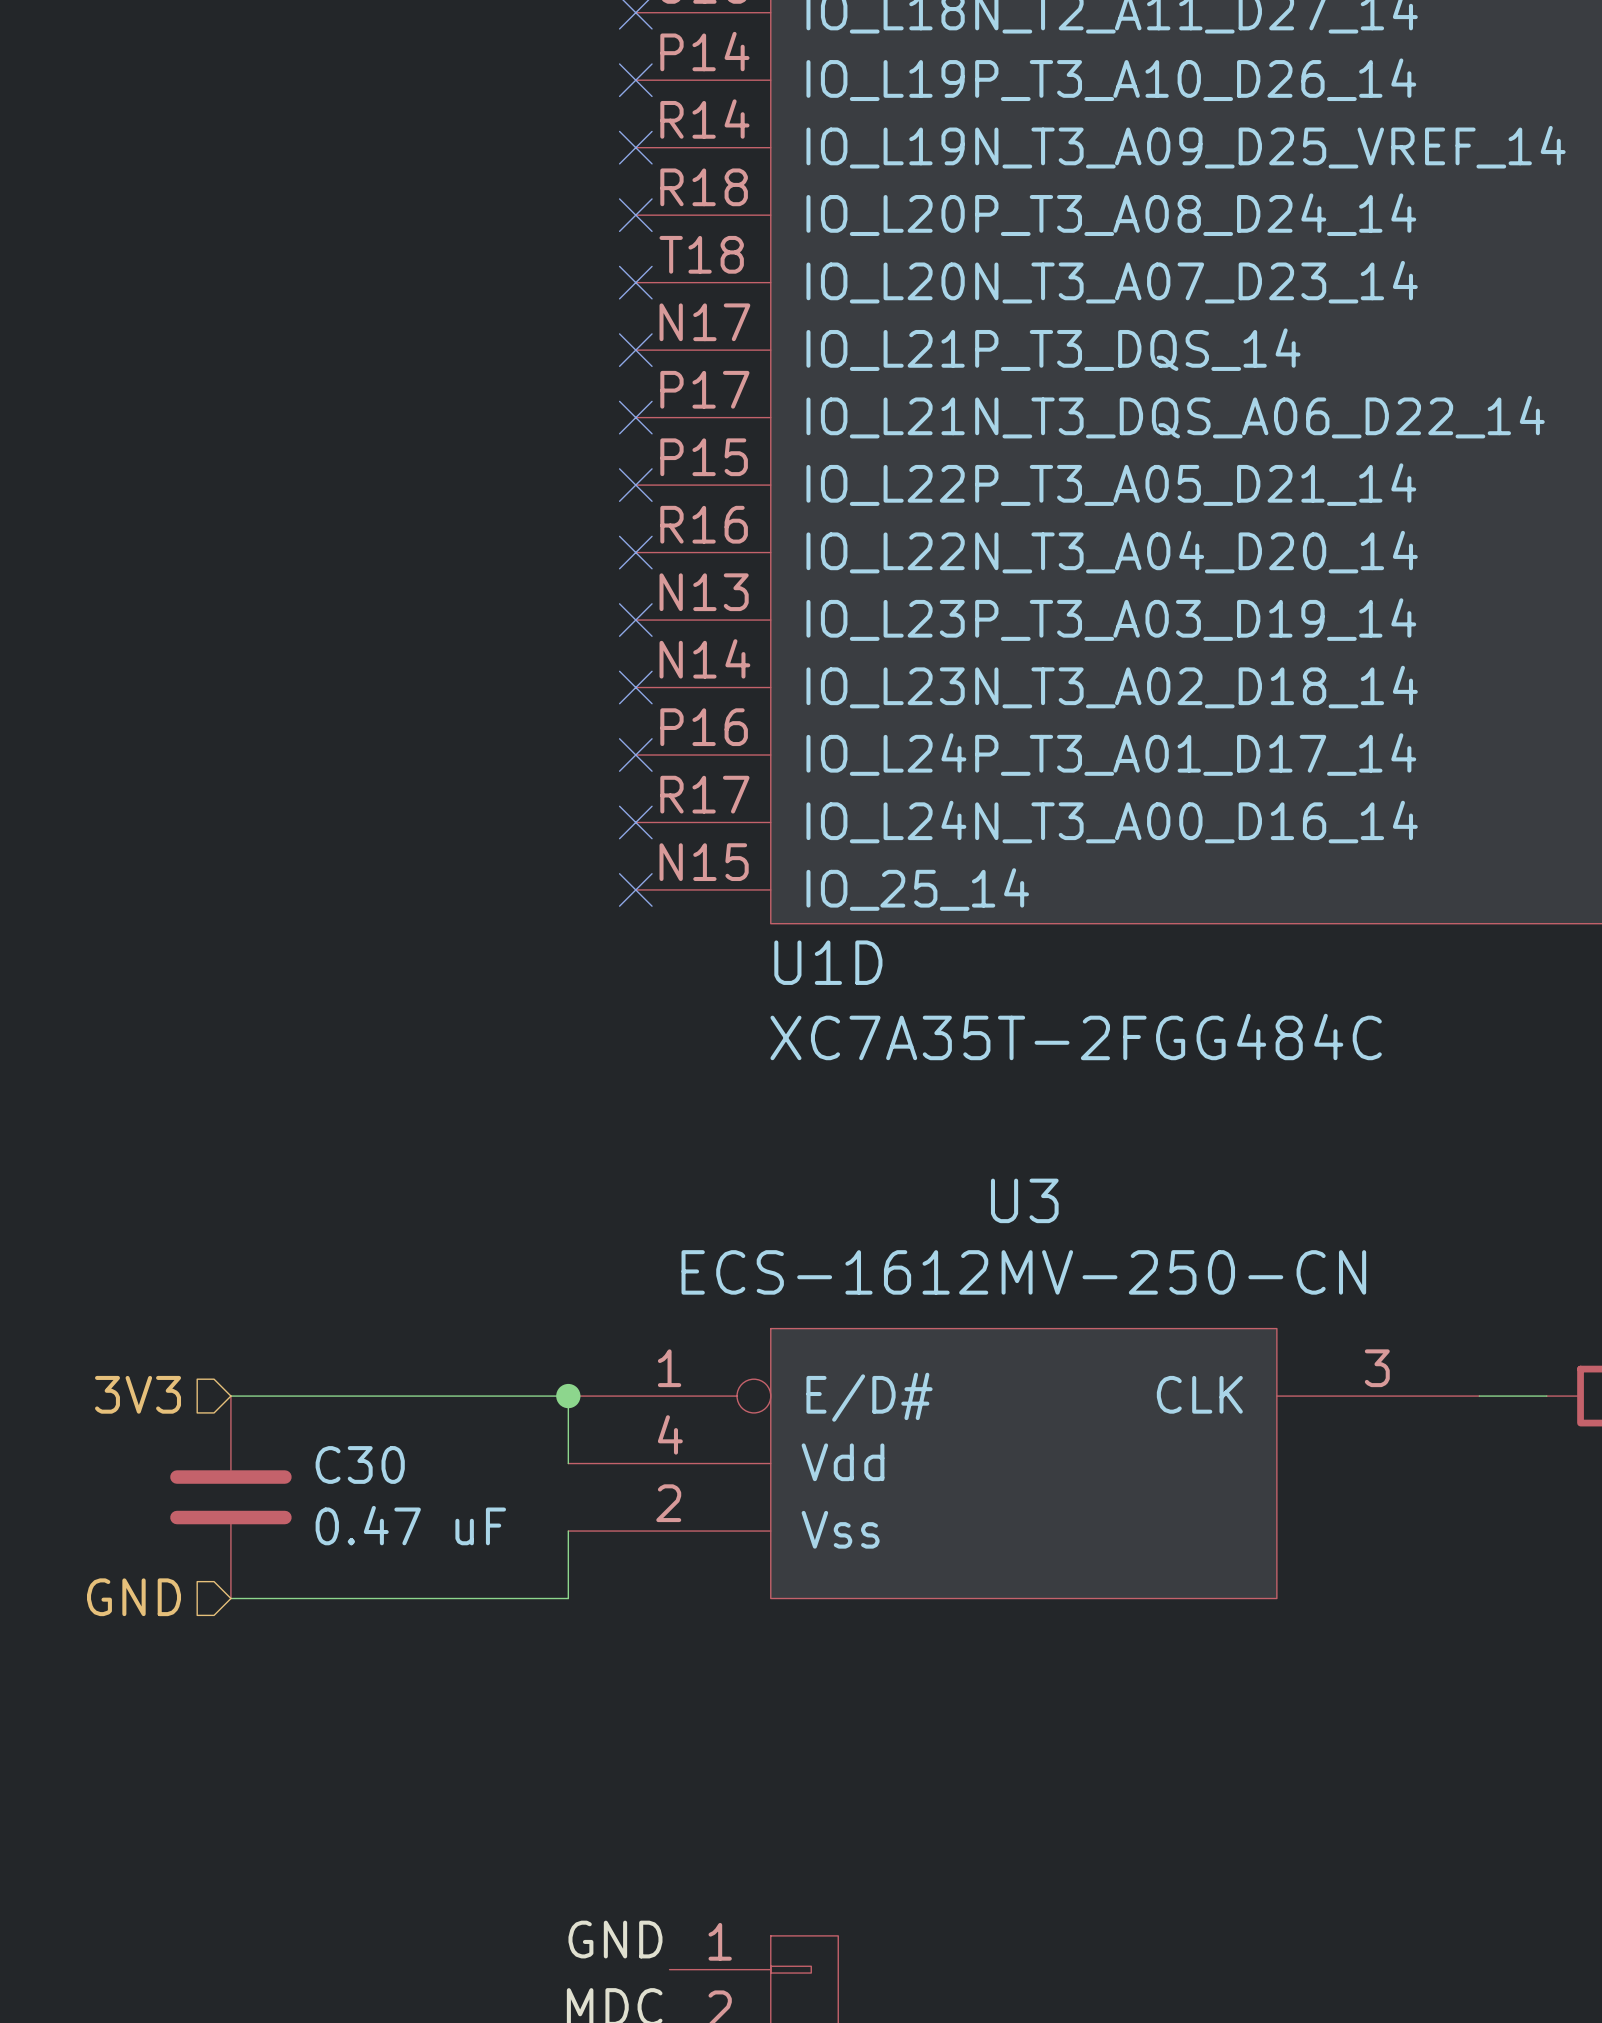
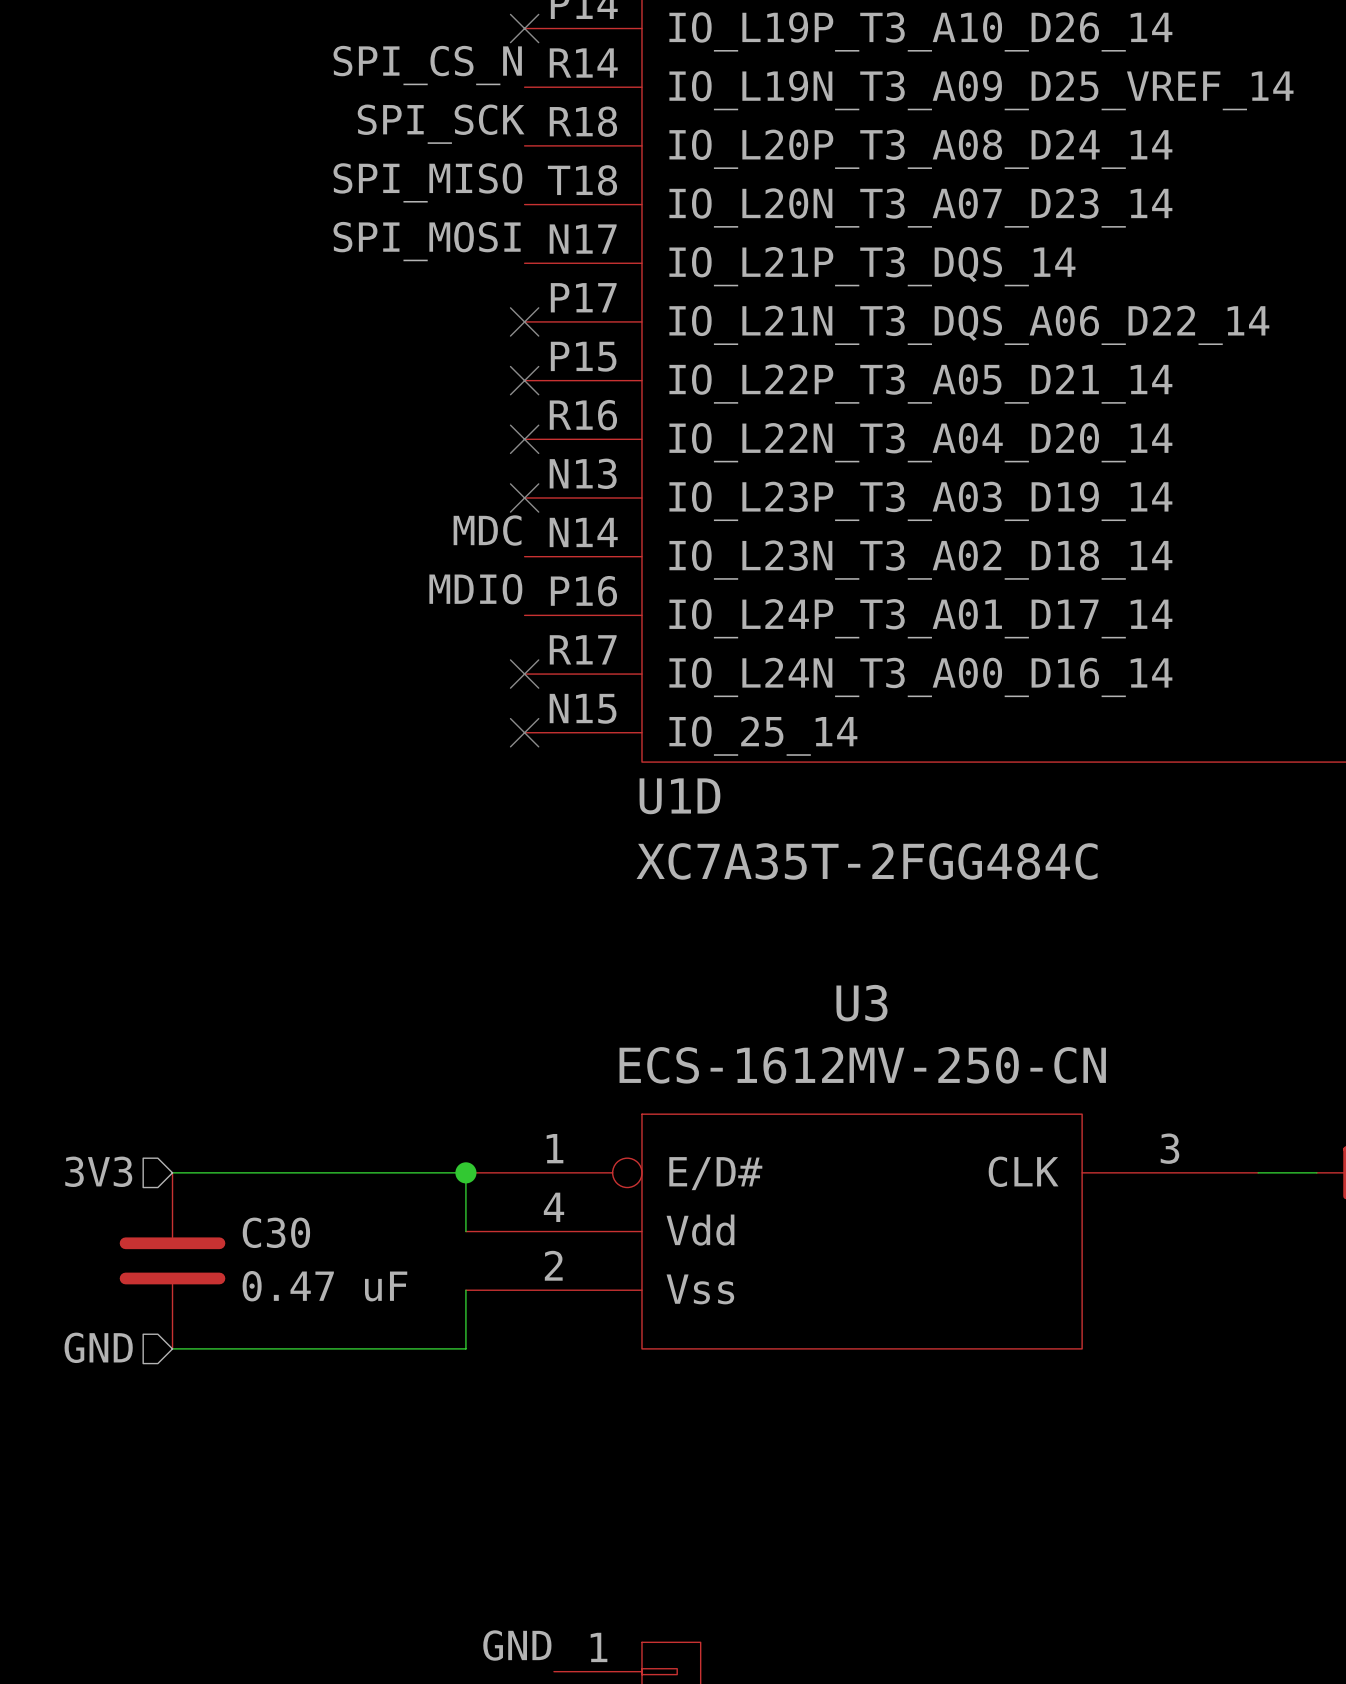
label: none -> SPI_CS_N (427, 65)
no-connect mark: (635, 147) -> none
label: none -> SPI_SCK (441, 124)
no-connect mark: (635, 215) -> none
label: none -> SPI_MISO (427, 182)
no-connect mark: (635, 282) -> none
label: none -> SPI_MOSI (427, 241)
no-connect mark: (635, 350) -> none
label: none -> MDC (487, 530)
no-connect mark: (635, 687) -> none
label: none -> MDIO (475, 589)
no-connect mark: (635, 755) -> none

